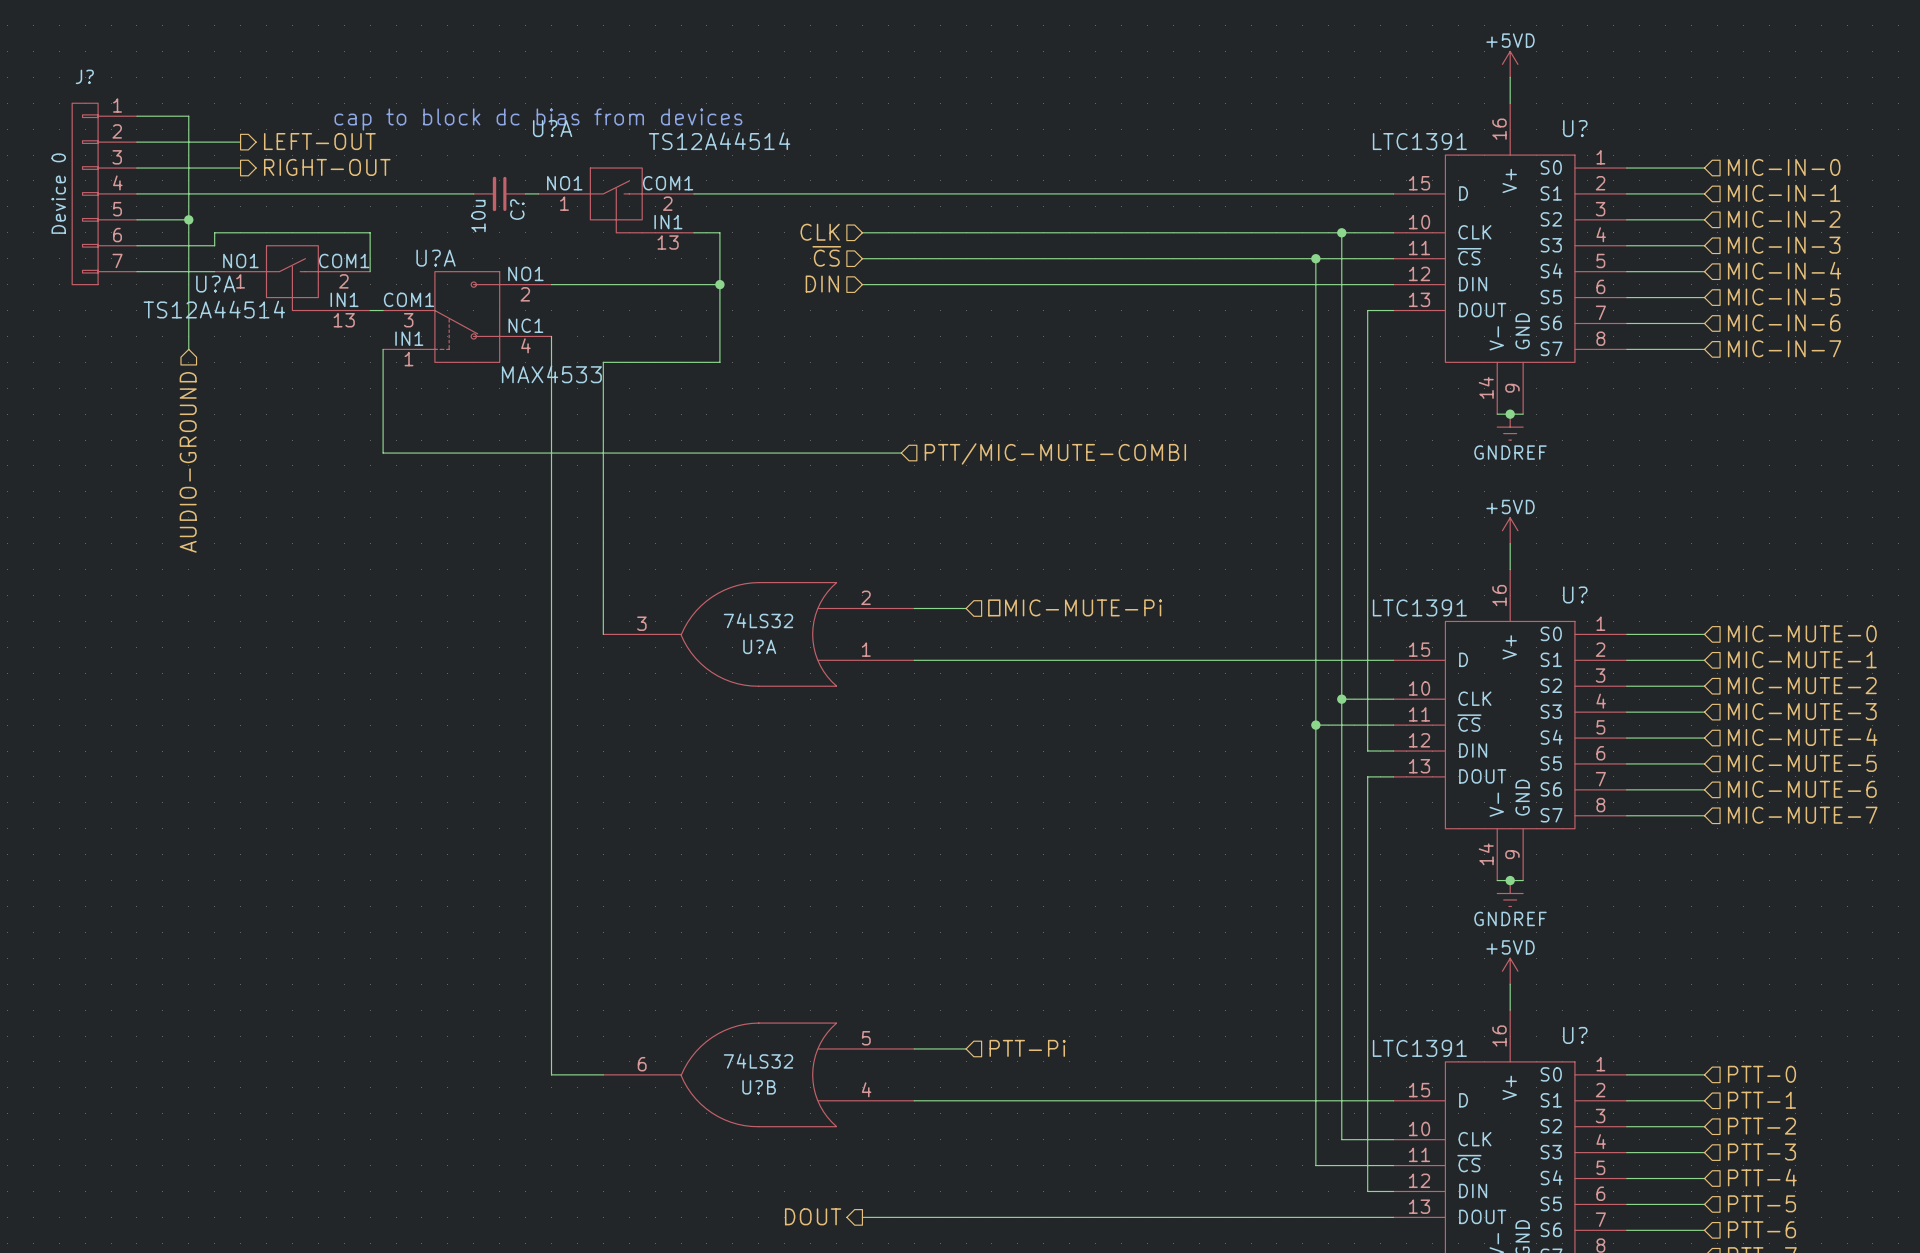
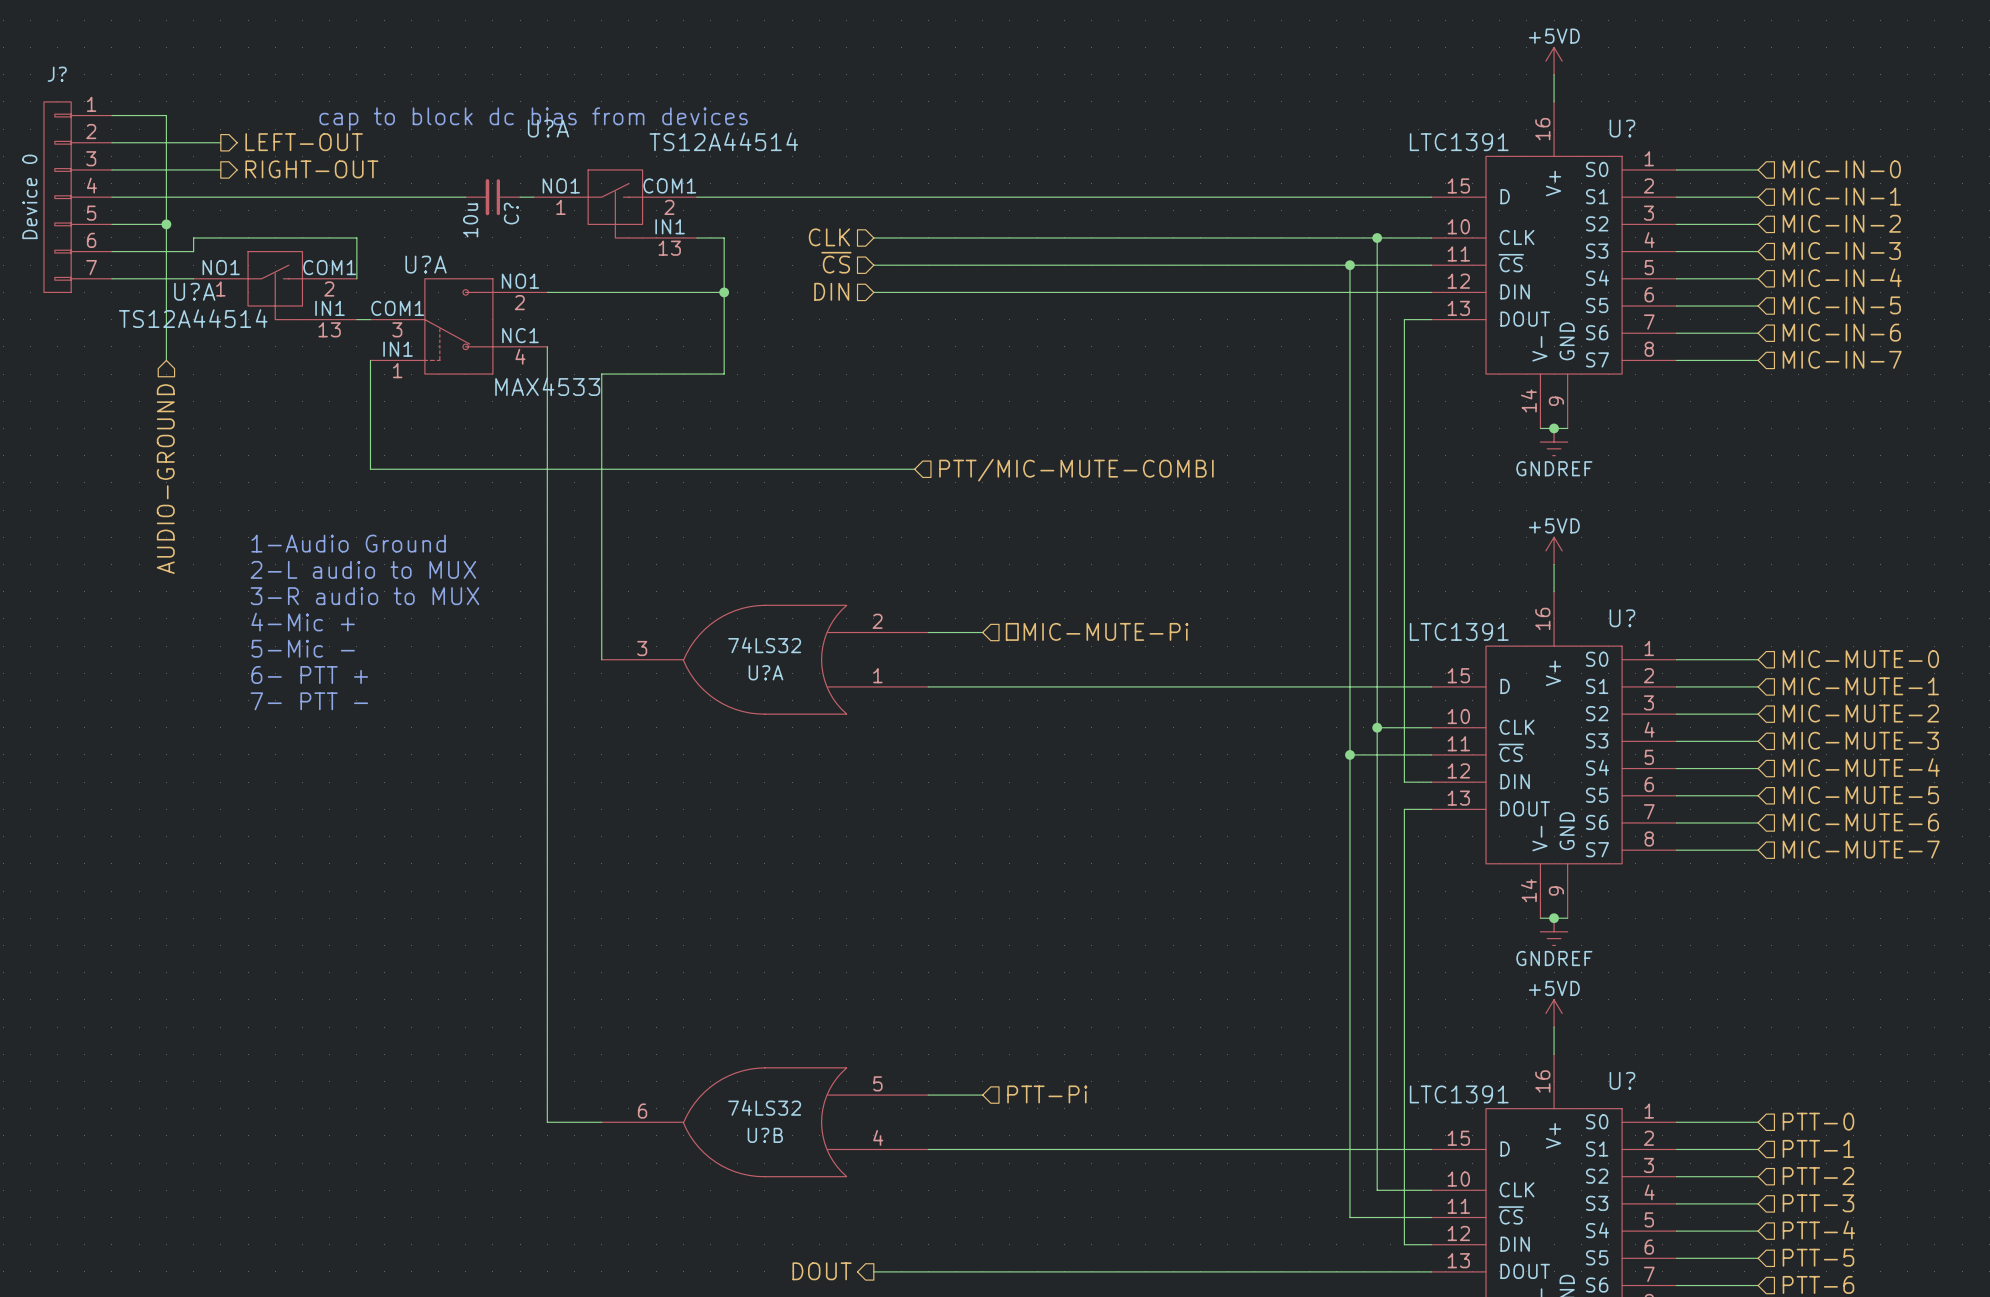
text: none -> 1-Audio Ground (348, 543)
text: none -> 2-L audio to MUX (363, 569)
text: none -> 3-R audio to MUX (364, 596)
text: none -> 4-Mic + (303, 622)
text: none -> 5-Mic - (303, 648)
text: none -> 6- PTT + (309, 675)
text: none -> 7- PTT - (309, 701)

